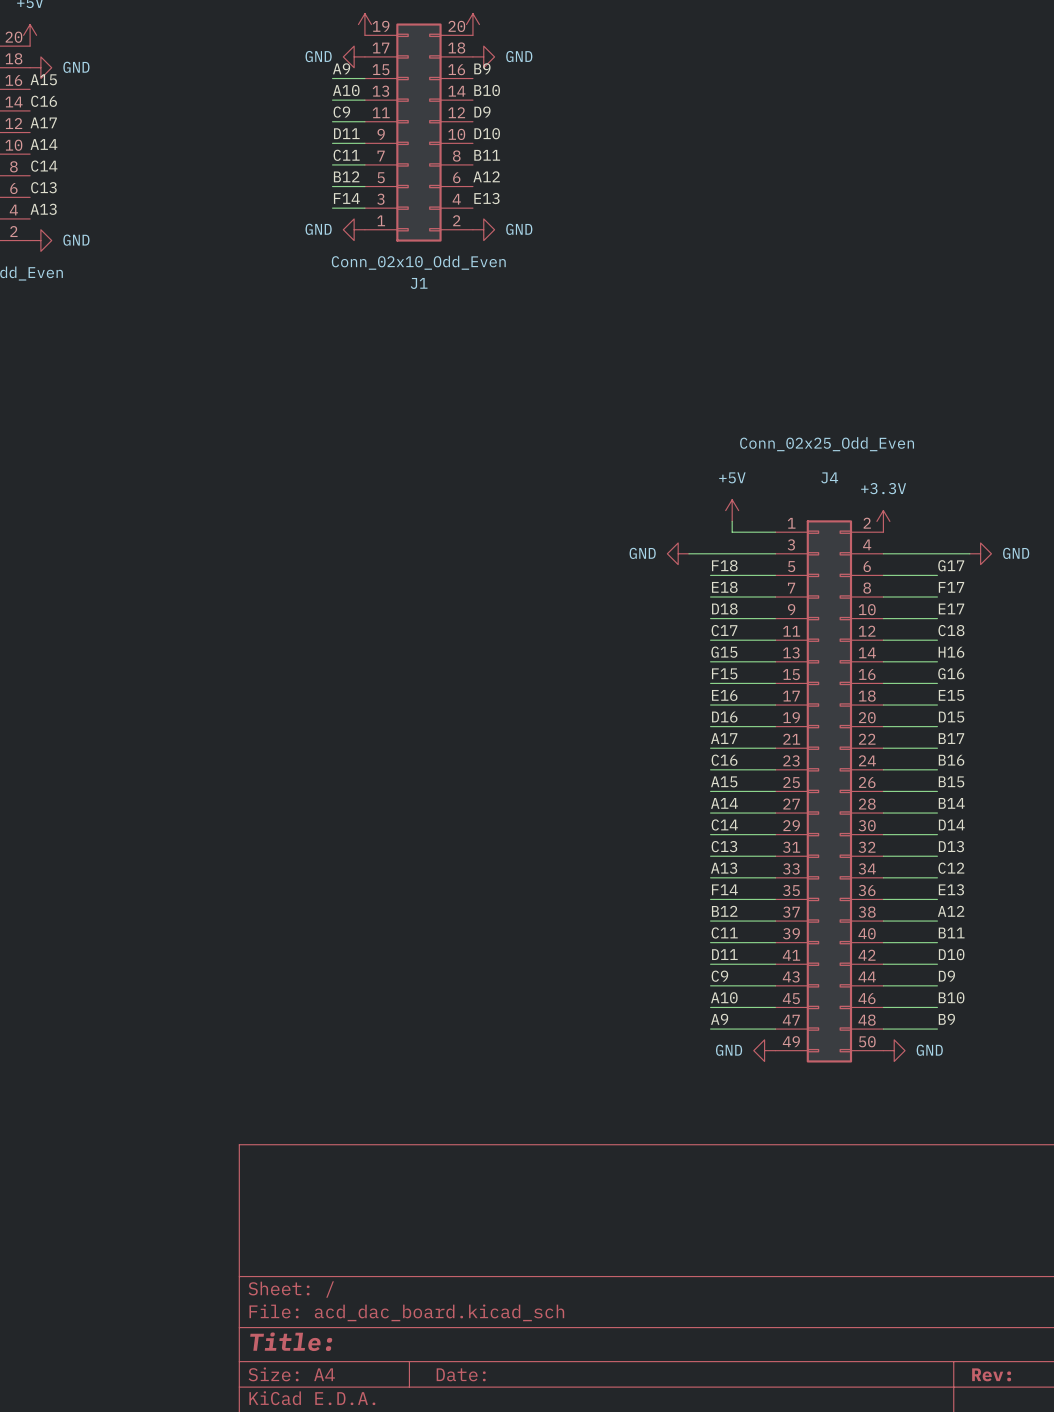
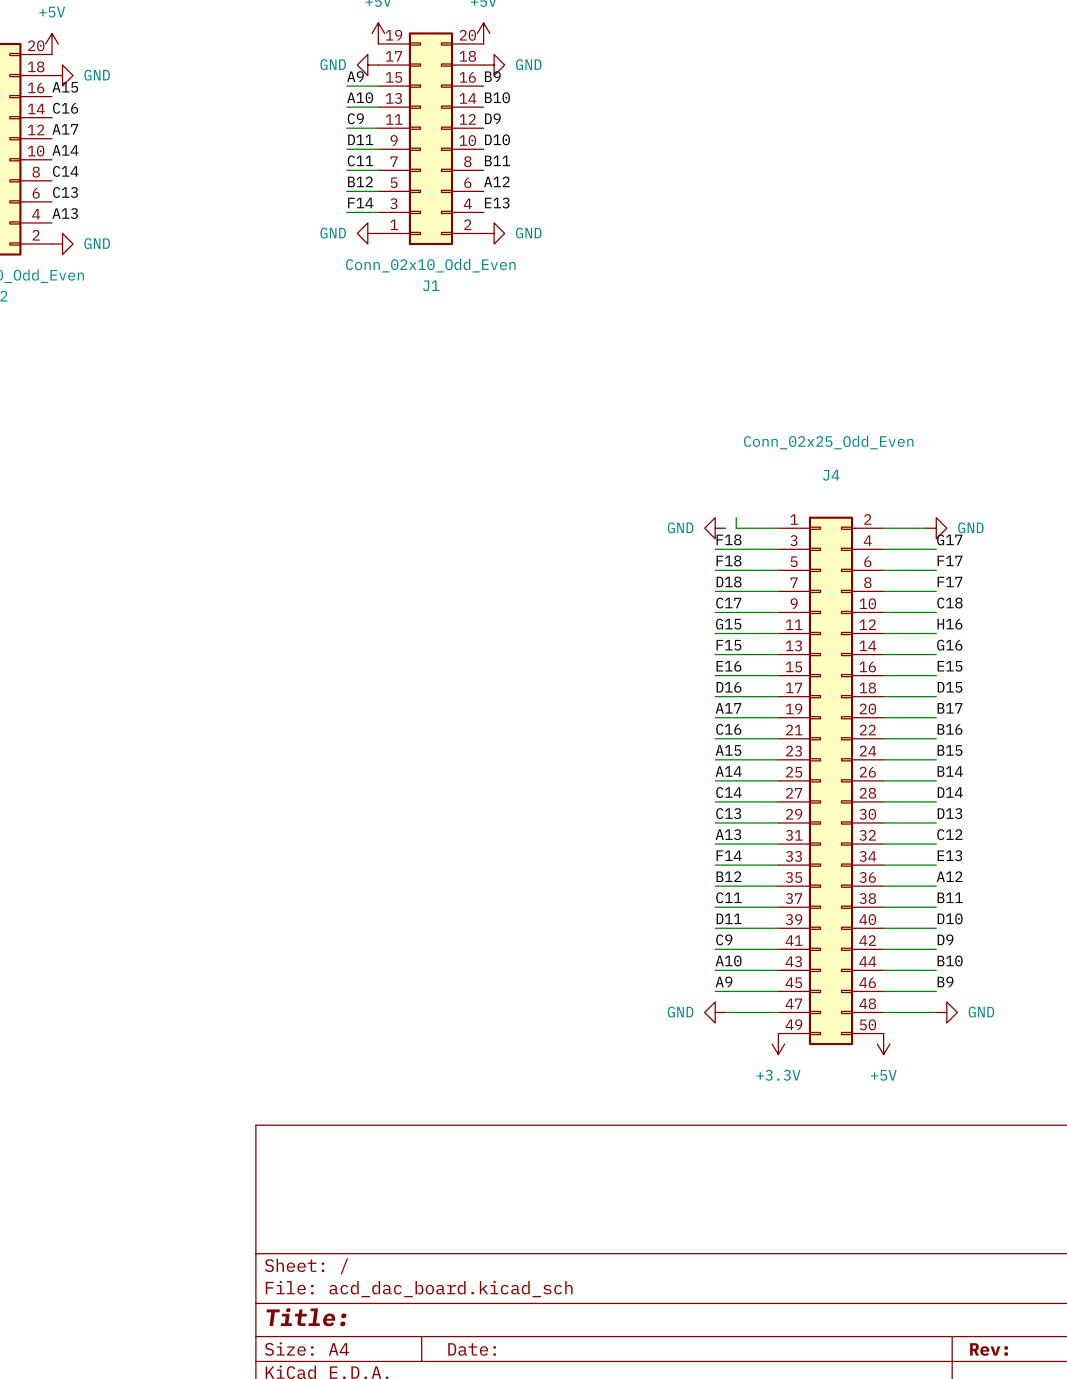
power symbol: +5V (732, 510) -> none
power symbol: +3.3V (883, 521) -> none
wire: none -> (883, 528) (925, 528)
label: none -> F18 (729, 539)
label: none -> G17 (949, 539)
power symbol position: GND (678, 553) -> GND (715, 528)
wire: (688, 553) (710, 553) -> none
wire: (937, 553) (969, 553) -> none
power symbol position: GND (980, 553) -> GND (936, 528)
label: G17 (951, 565) -> F17 (950, 560)
label: E18 (724, 587) -> D18 (729, 582)
label: D18 (724, 608) -> C17 (728, 603)
label: E17 (951, 608) -> C18 (949, 603)
label: C17 (724, 630) -> G15 (728, 624)
label: C18 (951, 630) -> H16 (949, 624)
label: G15 (724, 652) -> F15 (728, 645)
label: H16 (951, 652) -> G16 (949, 645)
label: F15 (724, 673) -> E16 (728, 666)
label: G16 (951, 673) -> E15 (950, 666)
label: E16 (724, 695) -> D16 (729, 687)
label: E15 (951, 695) -> D15 (950, 687)
label: D16 (724, 717) -> A17 (728, 708)
label: D15 (951, 717) -> B17 (949, 708)
label: A17 (724, 738) -> C16 (728, 729)
label: B17 (951, 738) -> B16 (950, 729)
label: C16 (724, 760) -> A15 (728, 750)
label: B16 (951, 760) -> B15 (950, 750)
label: A15 (724, 781) -> A14 (728, 771)
label: B15 (951, 781) -> B14 (950, 771)
label: A14 (724, 803) -> C14 (729, 792)
label: B14 (951, 803) -> D14 (950, 792)
label: C14 (724, 824) -> C13 (728, 813)
label: D14 (951, 824) -> D13 (949, 813)
label: C13 (724, 846) -> A13 (728, 834)
label: D13 (951, 846) -> C12 (949, 834)
label: A13 (724, 868) -> F14 (729, 855)
label: C12 (951, 868) -> E13 (949, 855)
label: F14 (724, 889) -> B12 (728, 876)
label: E13 (951, 889) -> A12 (949, 876)
label: B12 (724, 911) -> C11 (728, 897)
label: A12 (951, 911) -> B11 (950, 897)
label: C11 (724, 933) -> D11 (729, 918)
label: B11 (951, 933) -> D10 (950, 918)
label: D11 (724, 954) -> C9 (724, 939)
label: D10 (951, 954) -> D9 (945, 939)
label: C9 (719, 976) -> A10 (728, 960)
label: D9 (946, 976) -> B10 (950, 960)
label: A10 (724, 997) -> A9 (724, 981)
label: B10 (951, 997) -> B9 (945, 981)
label: A9 (719, 1019) -> none
label: B9 (946, 1019) -> none
power symbol position: GND (764, 1050) -> GND (715, 1012)
power symbol position: GND (894, 1050) -> GND (946, 1012)
power symbol: none -> +3.3V (778, 1044)
power symbol: none -> +5V (883, 1044)

